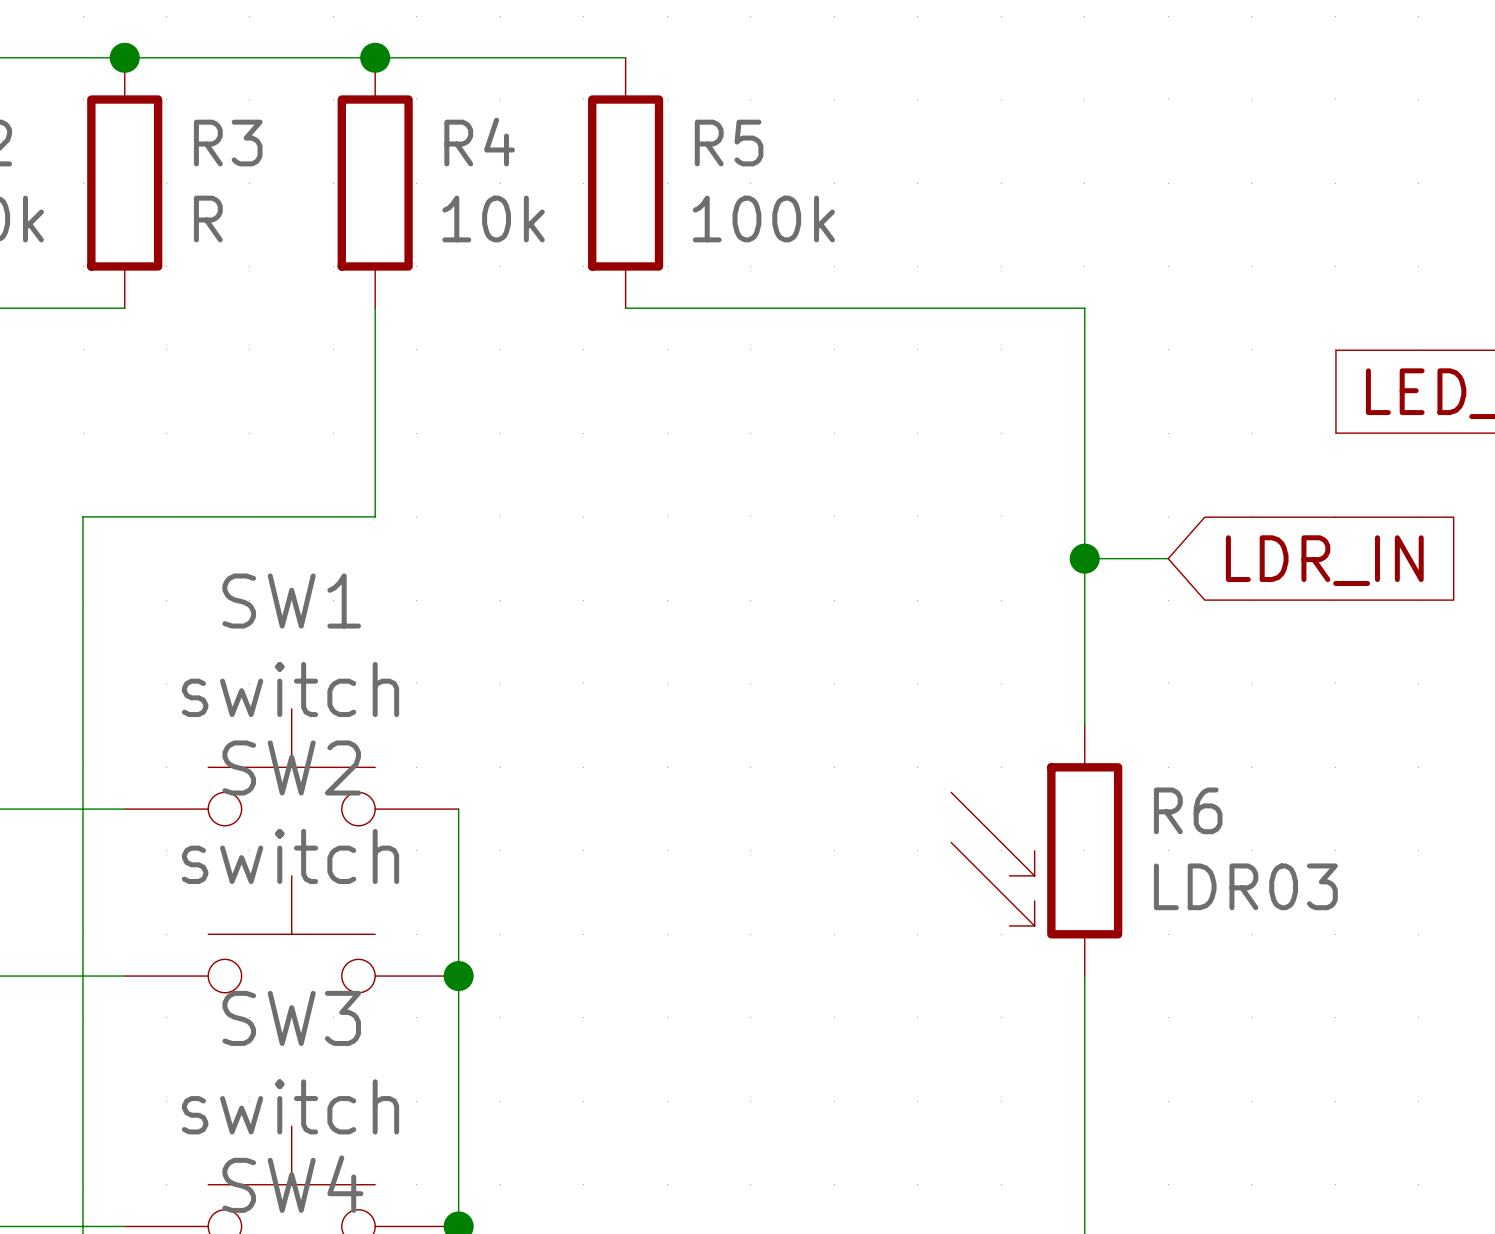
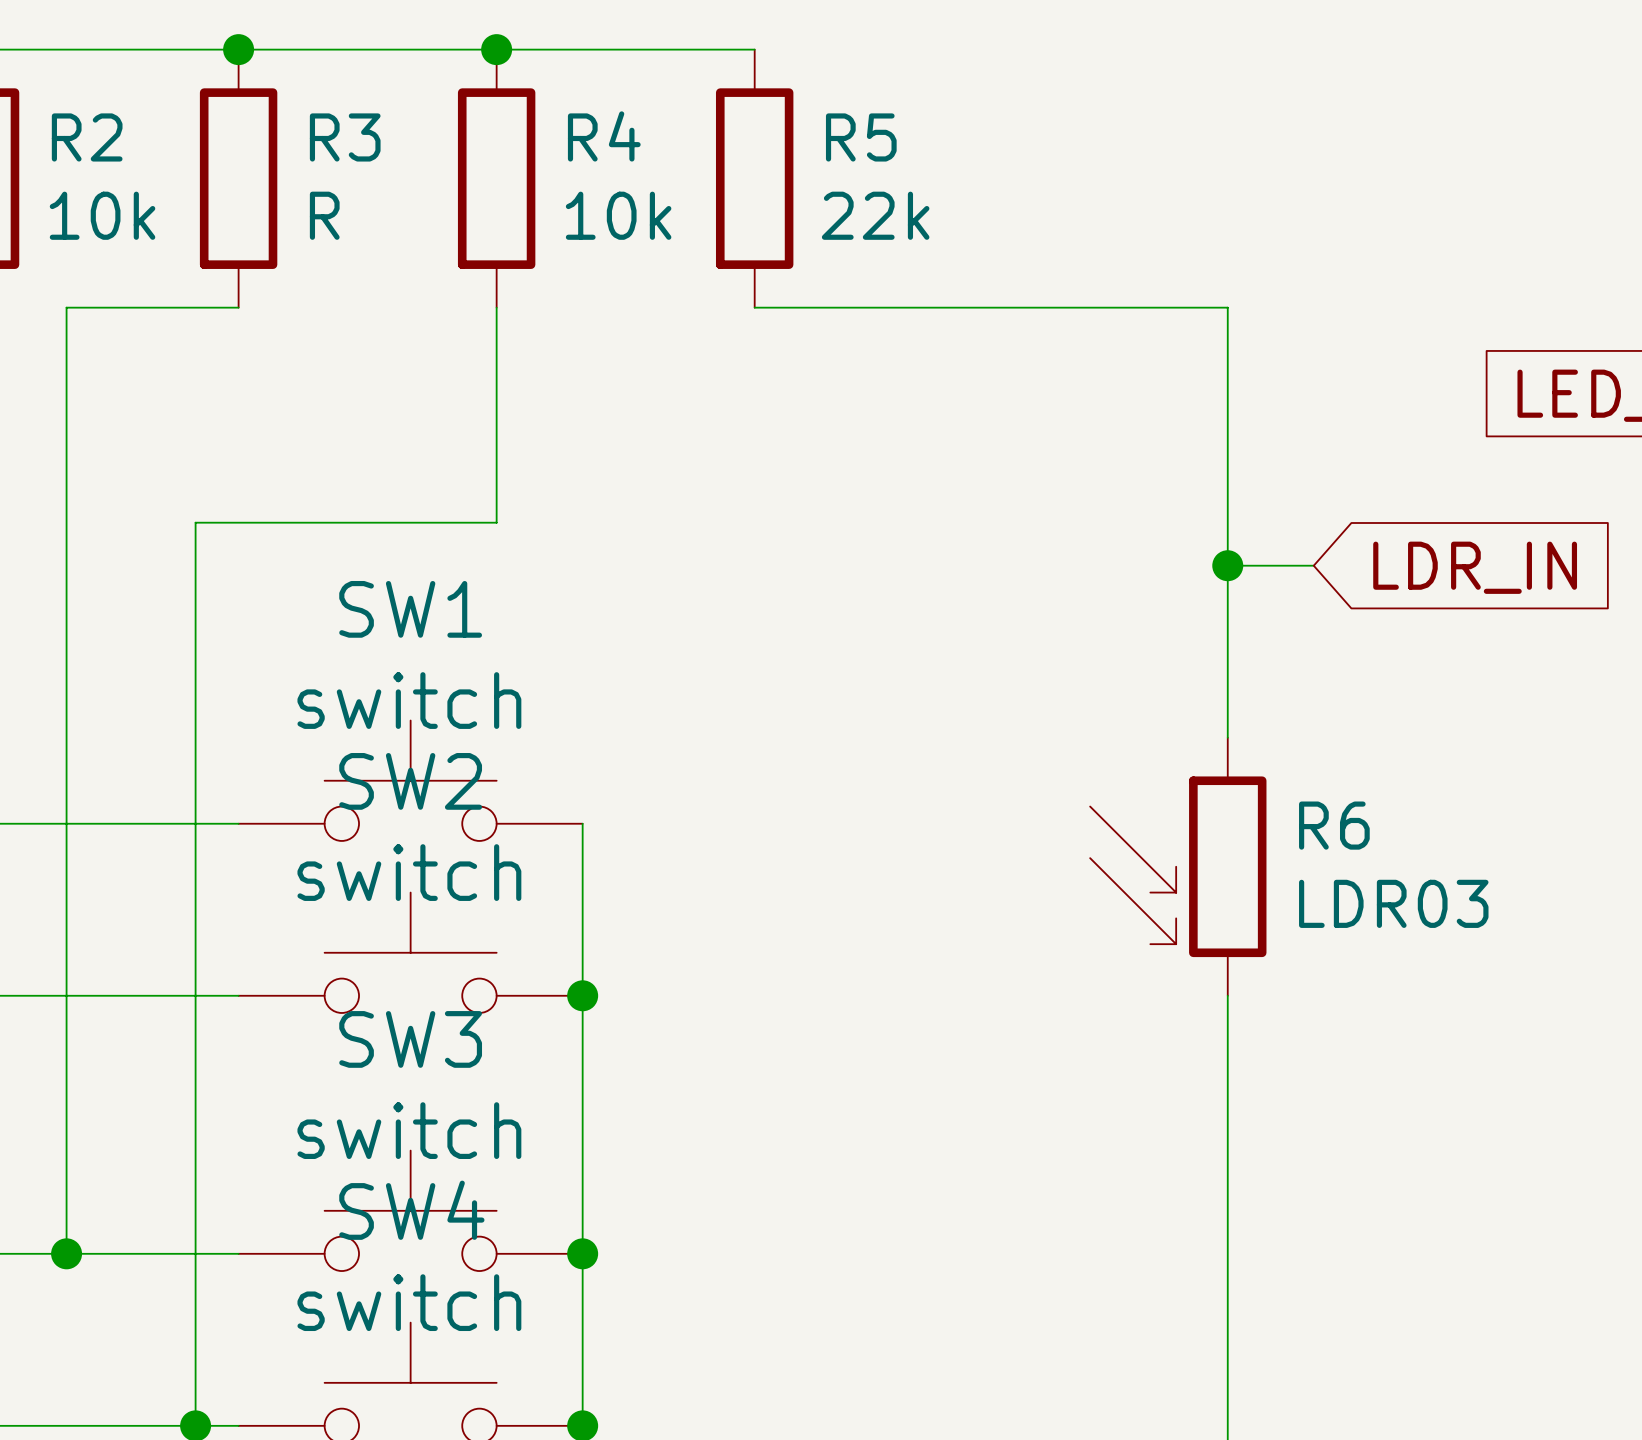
R5 value: 100k (763, 219) -> 22k (875, 215)

